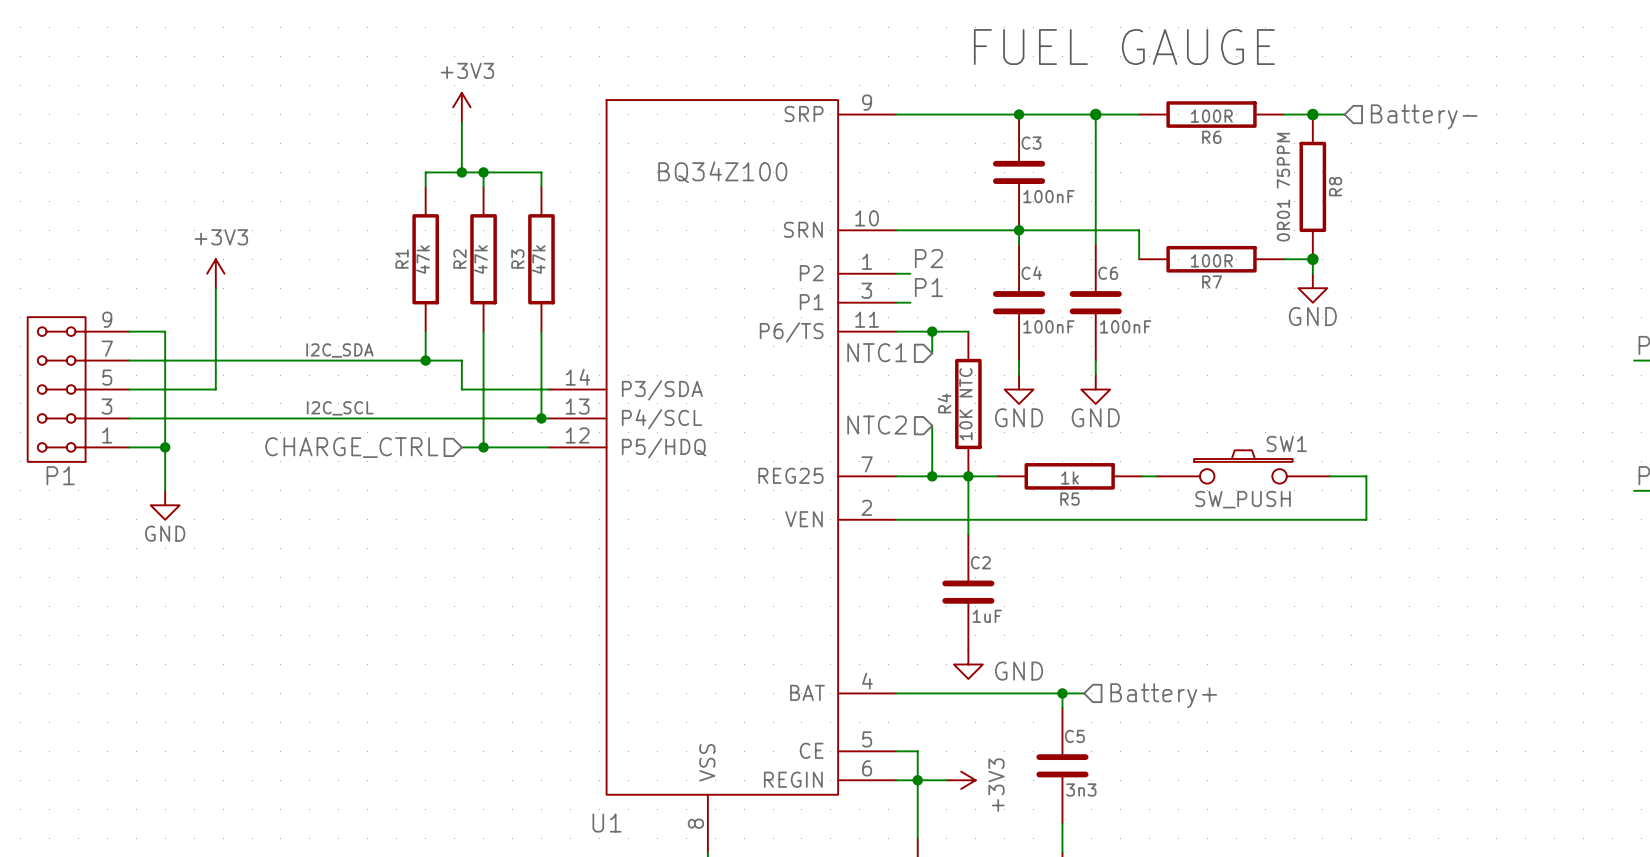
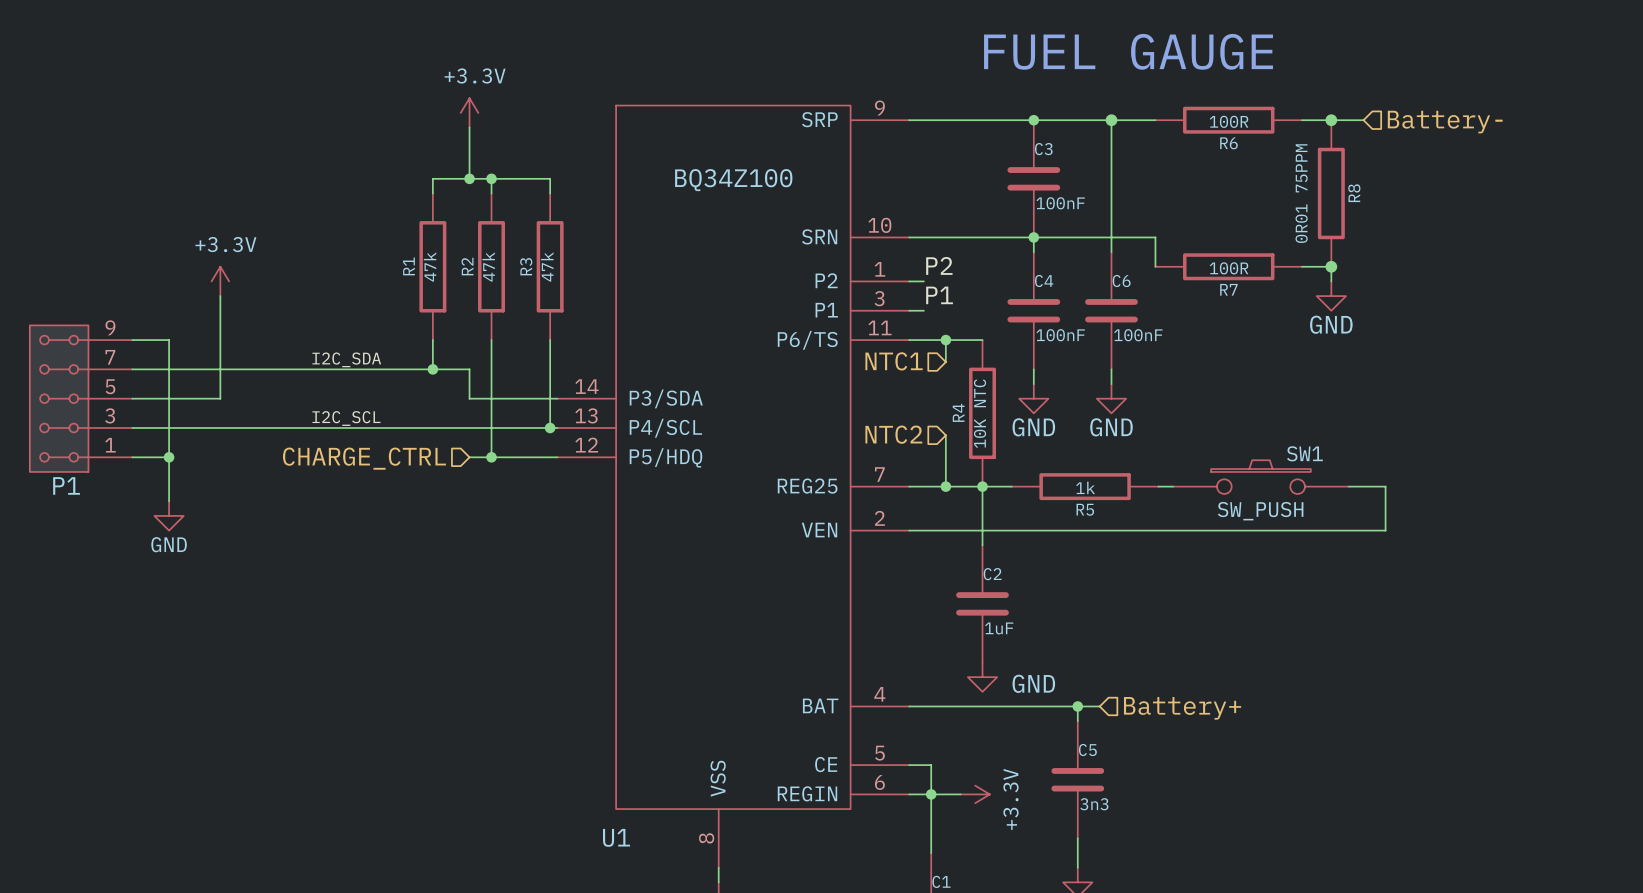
power symbol: +3V3 (461, 107) -> +3.3V (469, 112)
power symbol: +3V3 (215, 273) -> +3.3V (220, 281)
power symbol: +3V3 (961, 780) -> +3.3V (975, 794)

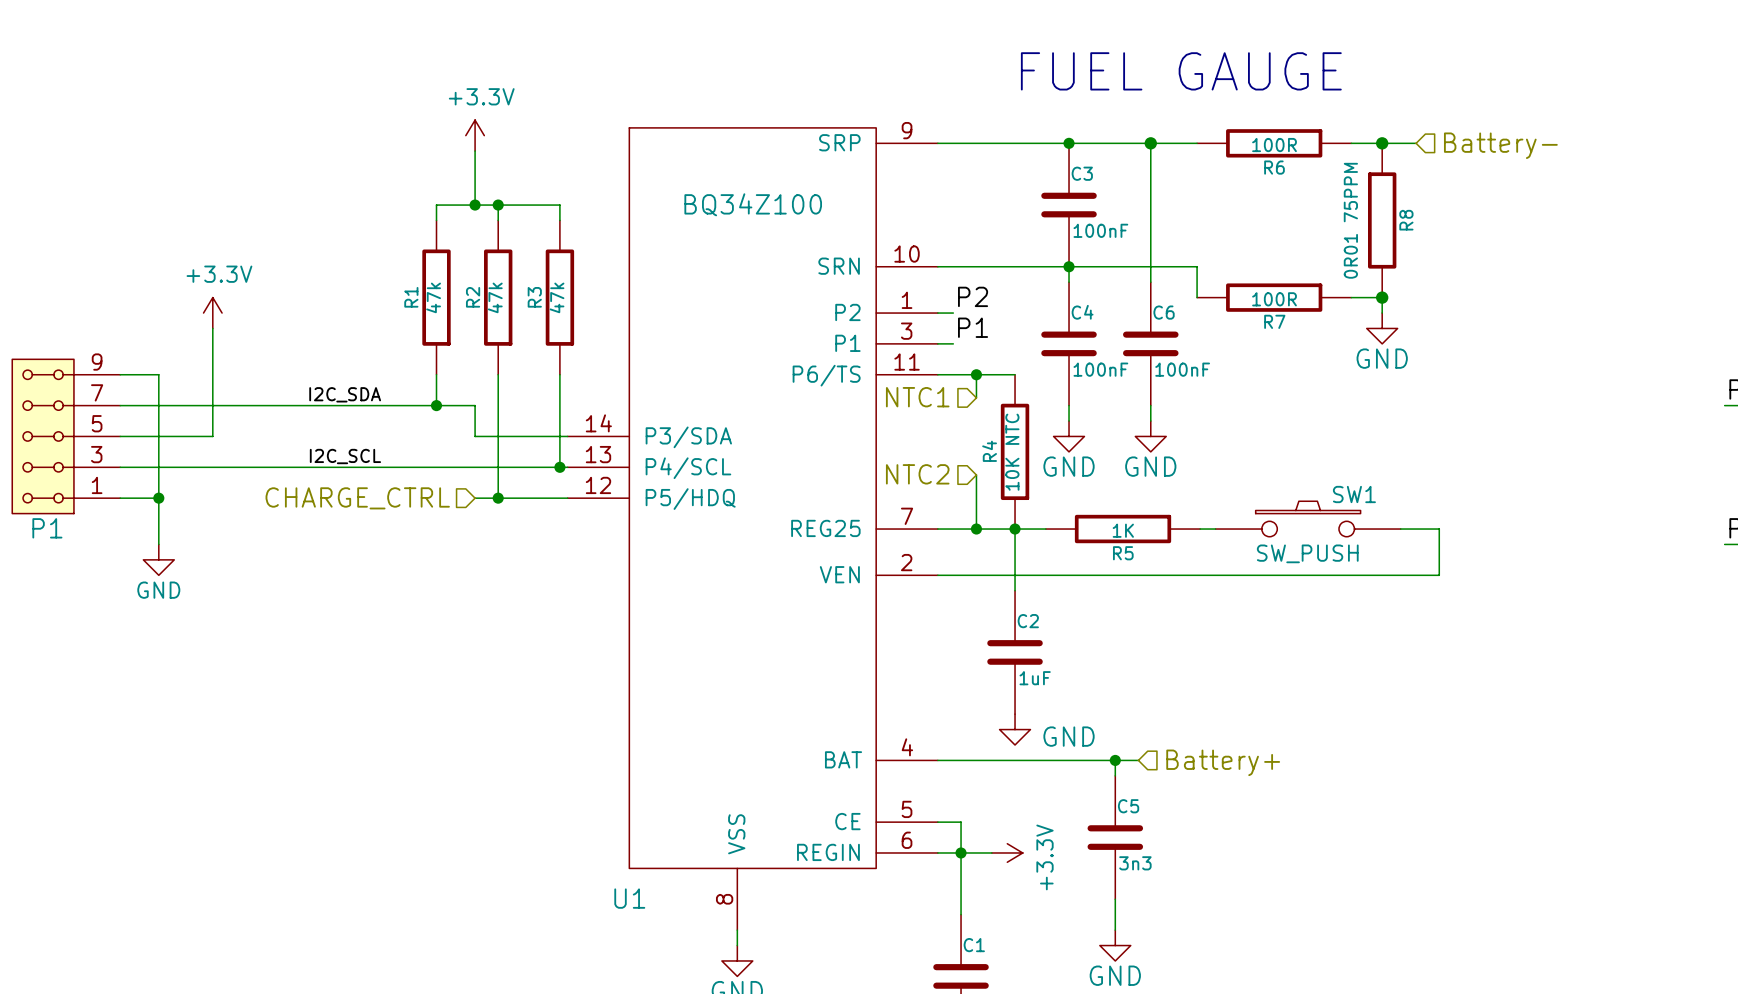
R5 value: 1k (1085, 487) -> 1K (1123, 530)

